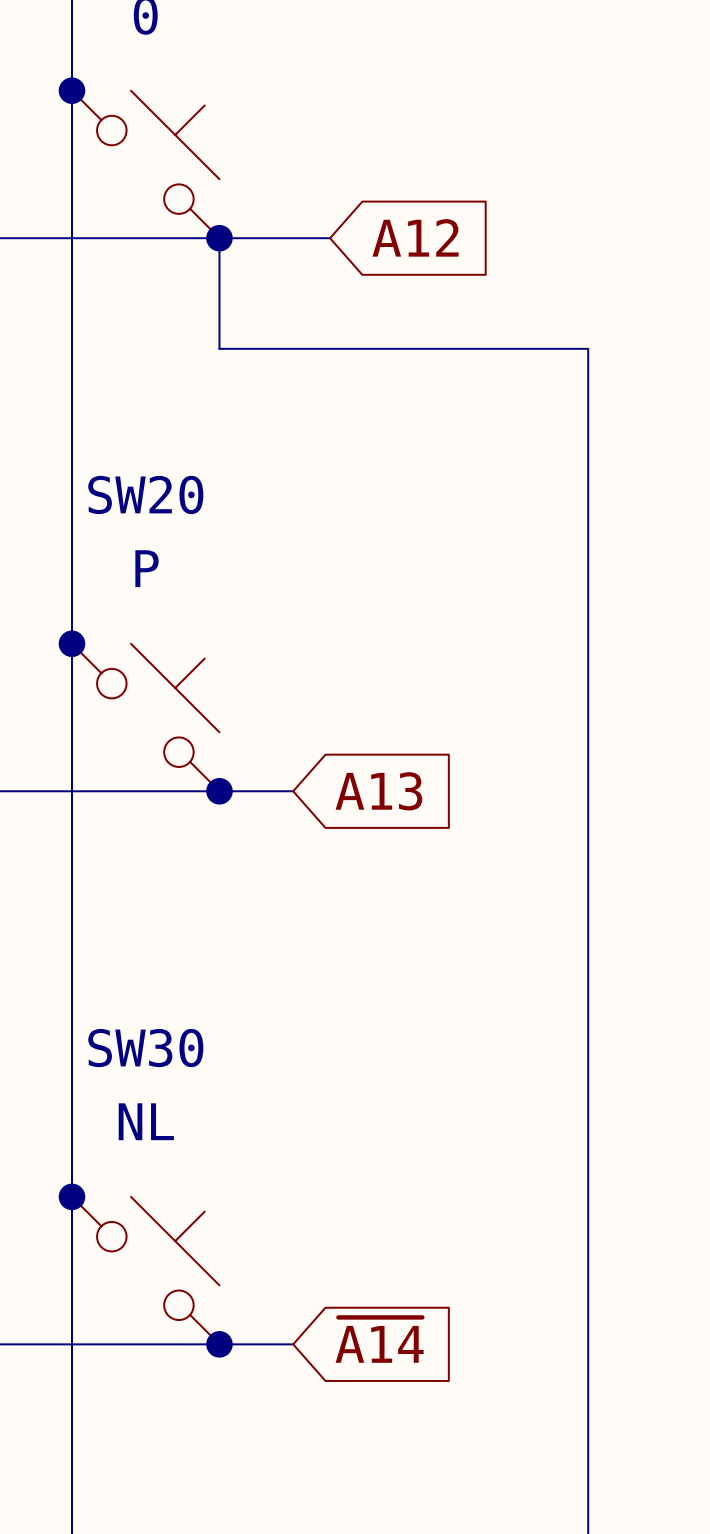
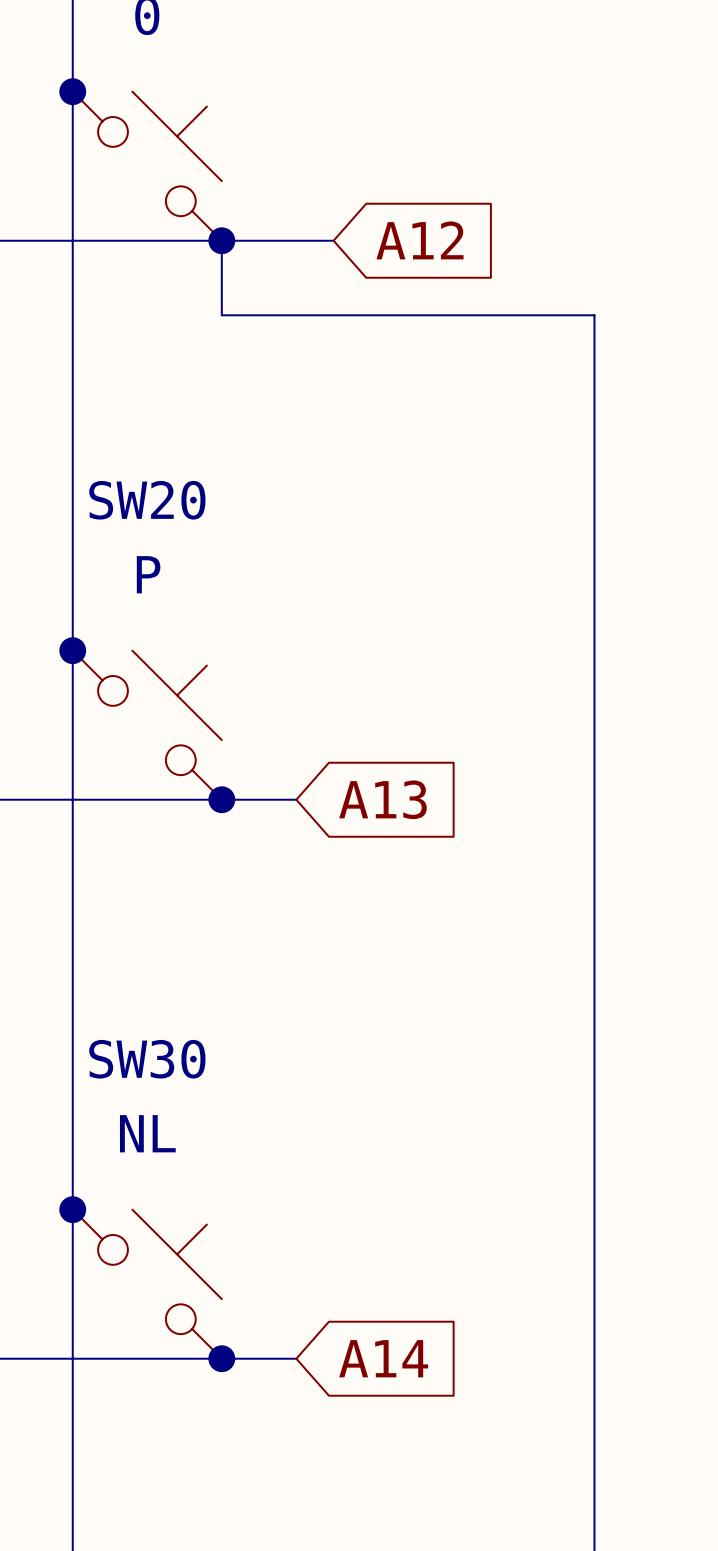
wire: (219, 311) (219, 348) (588, 348) -> (221, 315) (594, 315) (594, 352)
global label: ~{A14} (379, 1340) -> A14 (383, 1358)

